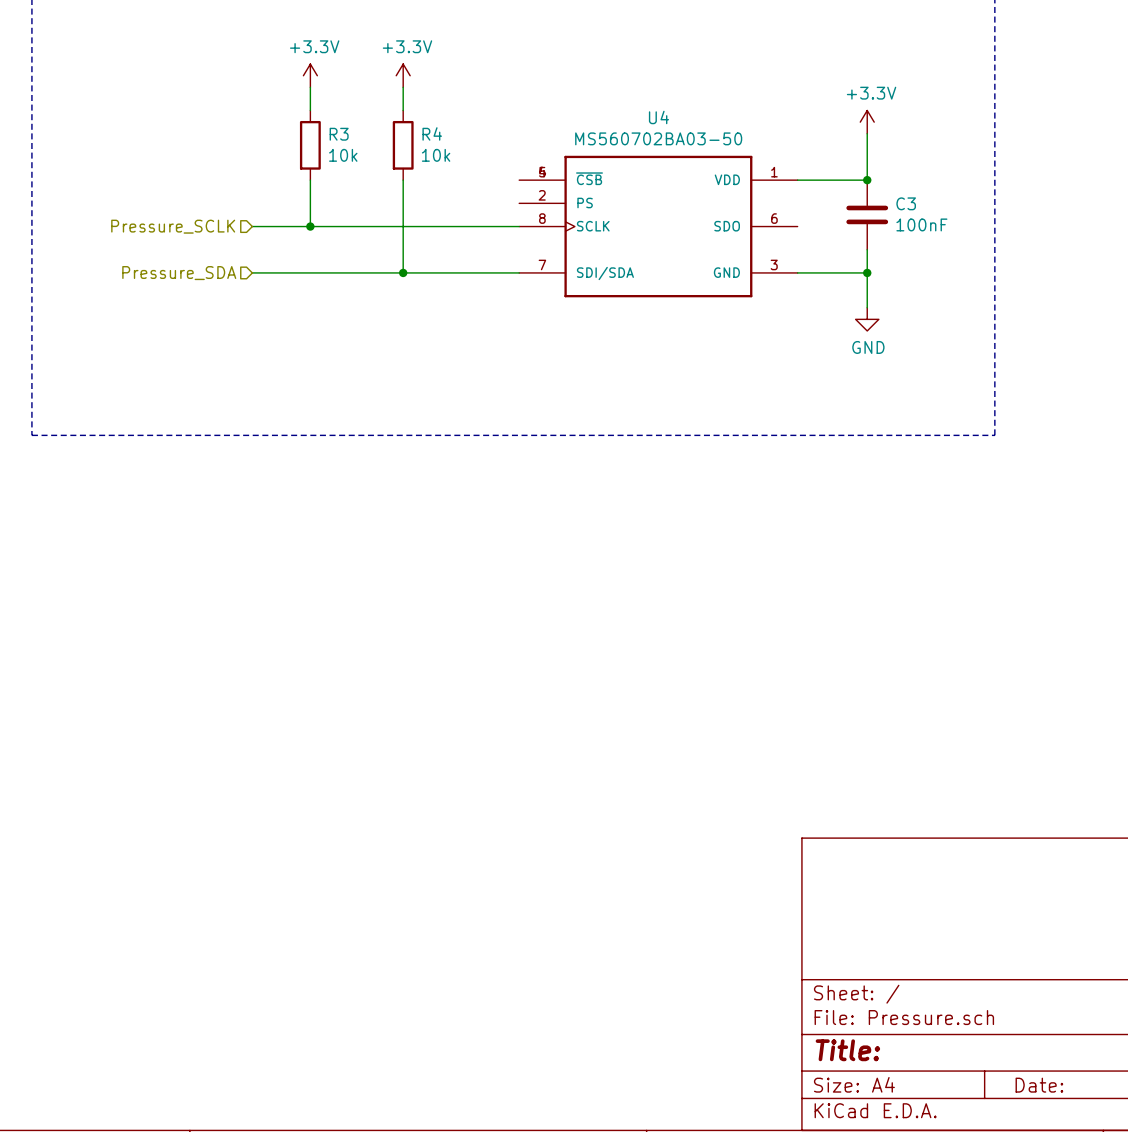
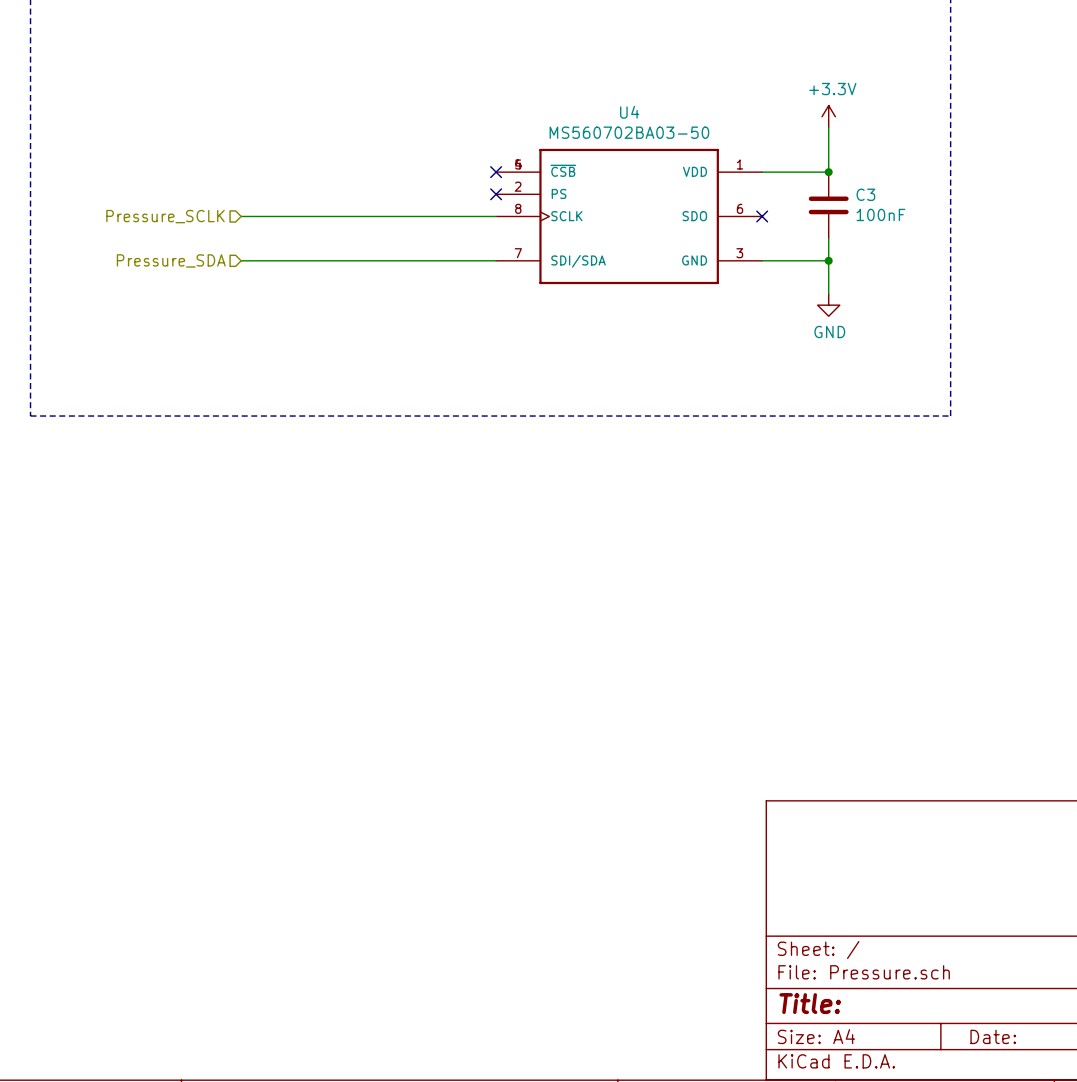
power symbol: +3.3V (310, 75) -> none
power symbol: +3.3V (403, 75) -> none
wire: (310, 87) (310, 110) -> none
wire: (403, 87) (403, 110) -> none
R3: 10k (310, 145) -> none
R4: 10k (403, 145) -> none
wire: (310, 180) (310, 226) -> none
wire: (403, 180) (403, 272) -> none
no-connect mark: none -> (496, 172)
no-connect mark: none -> (496, 194)
junction: (310, 226) -> none
no-connect mark: none -> (762, 216)
junction: (403, 272) -> none

